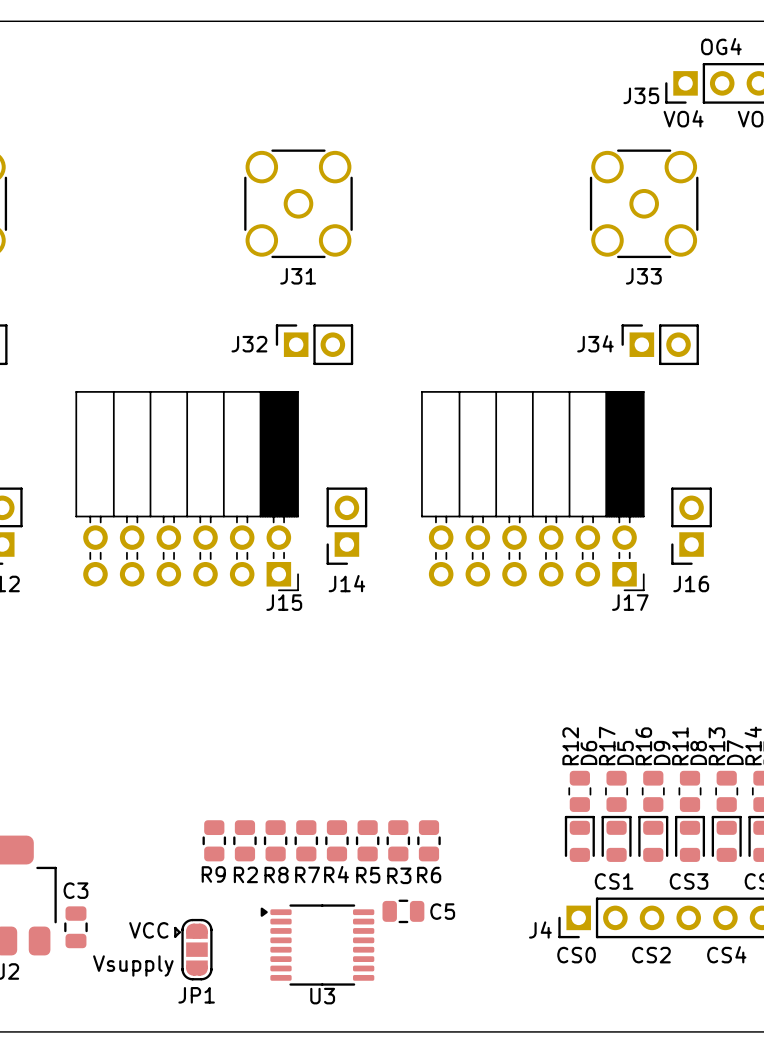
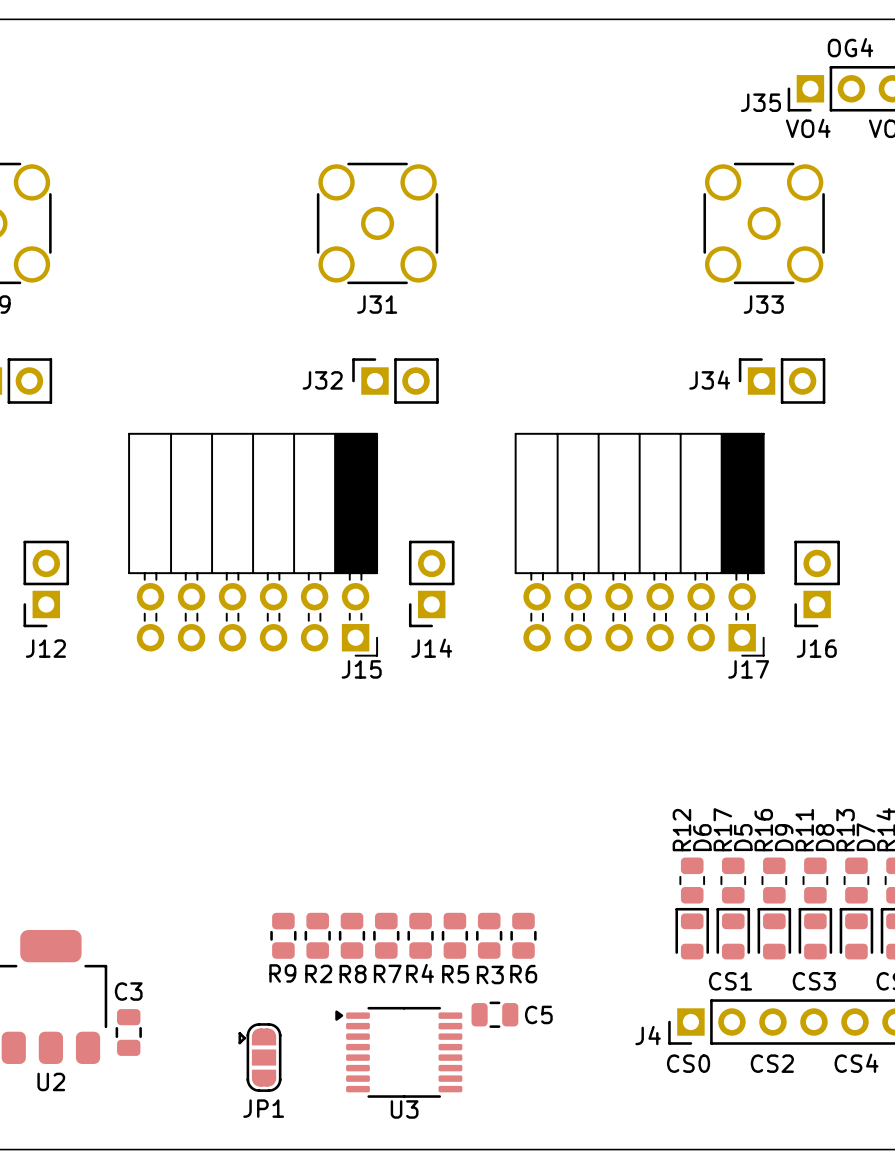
text: VCC (148, 930) -> none
text: Vsupply (133, 965) -> none

